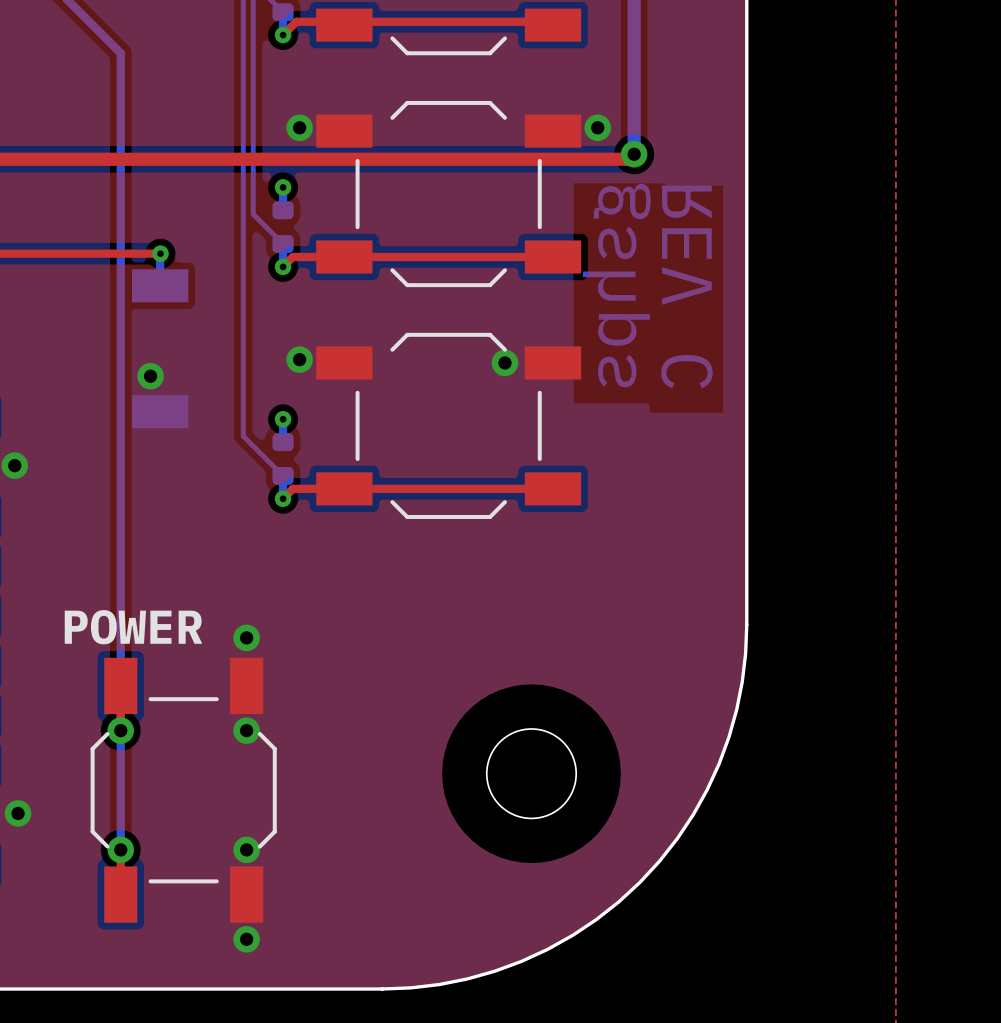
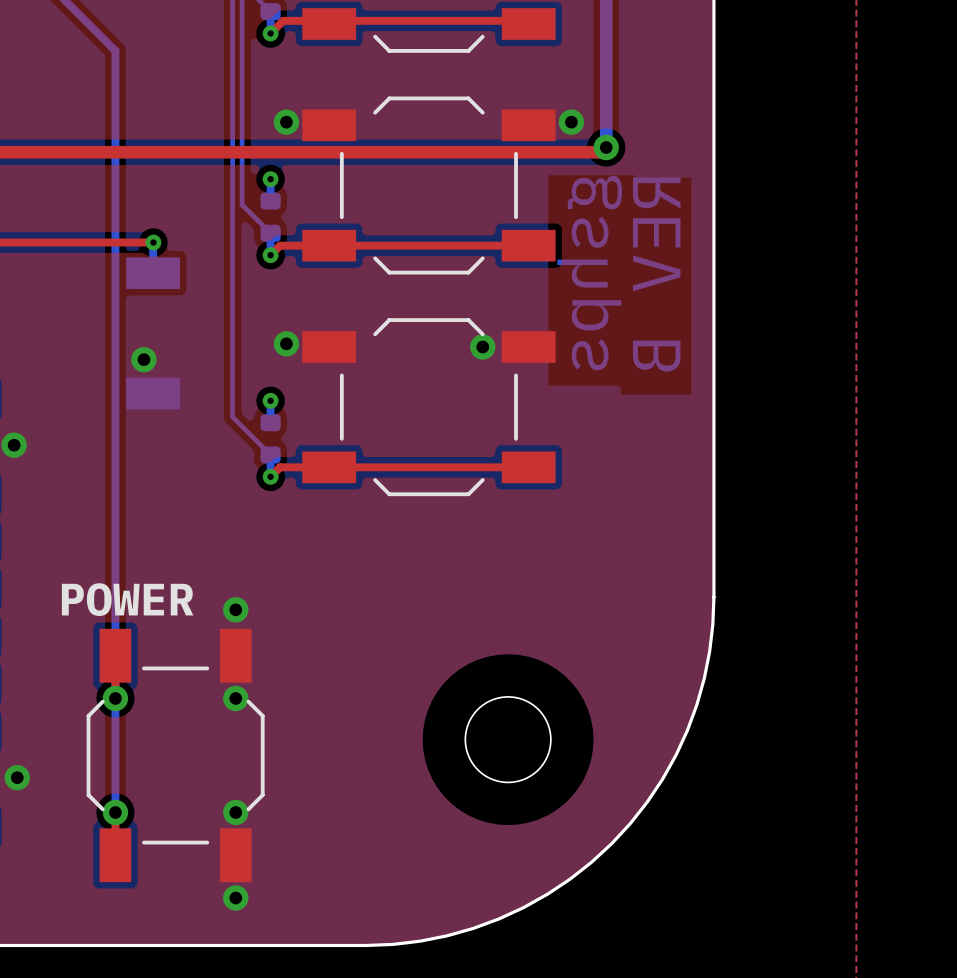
drawing shape: [582, 183, 713, 389] -> [557, 175, 681, 372]

